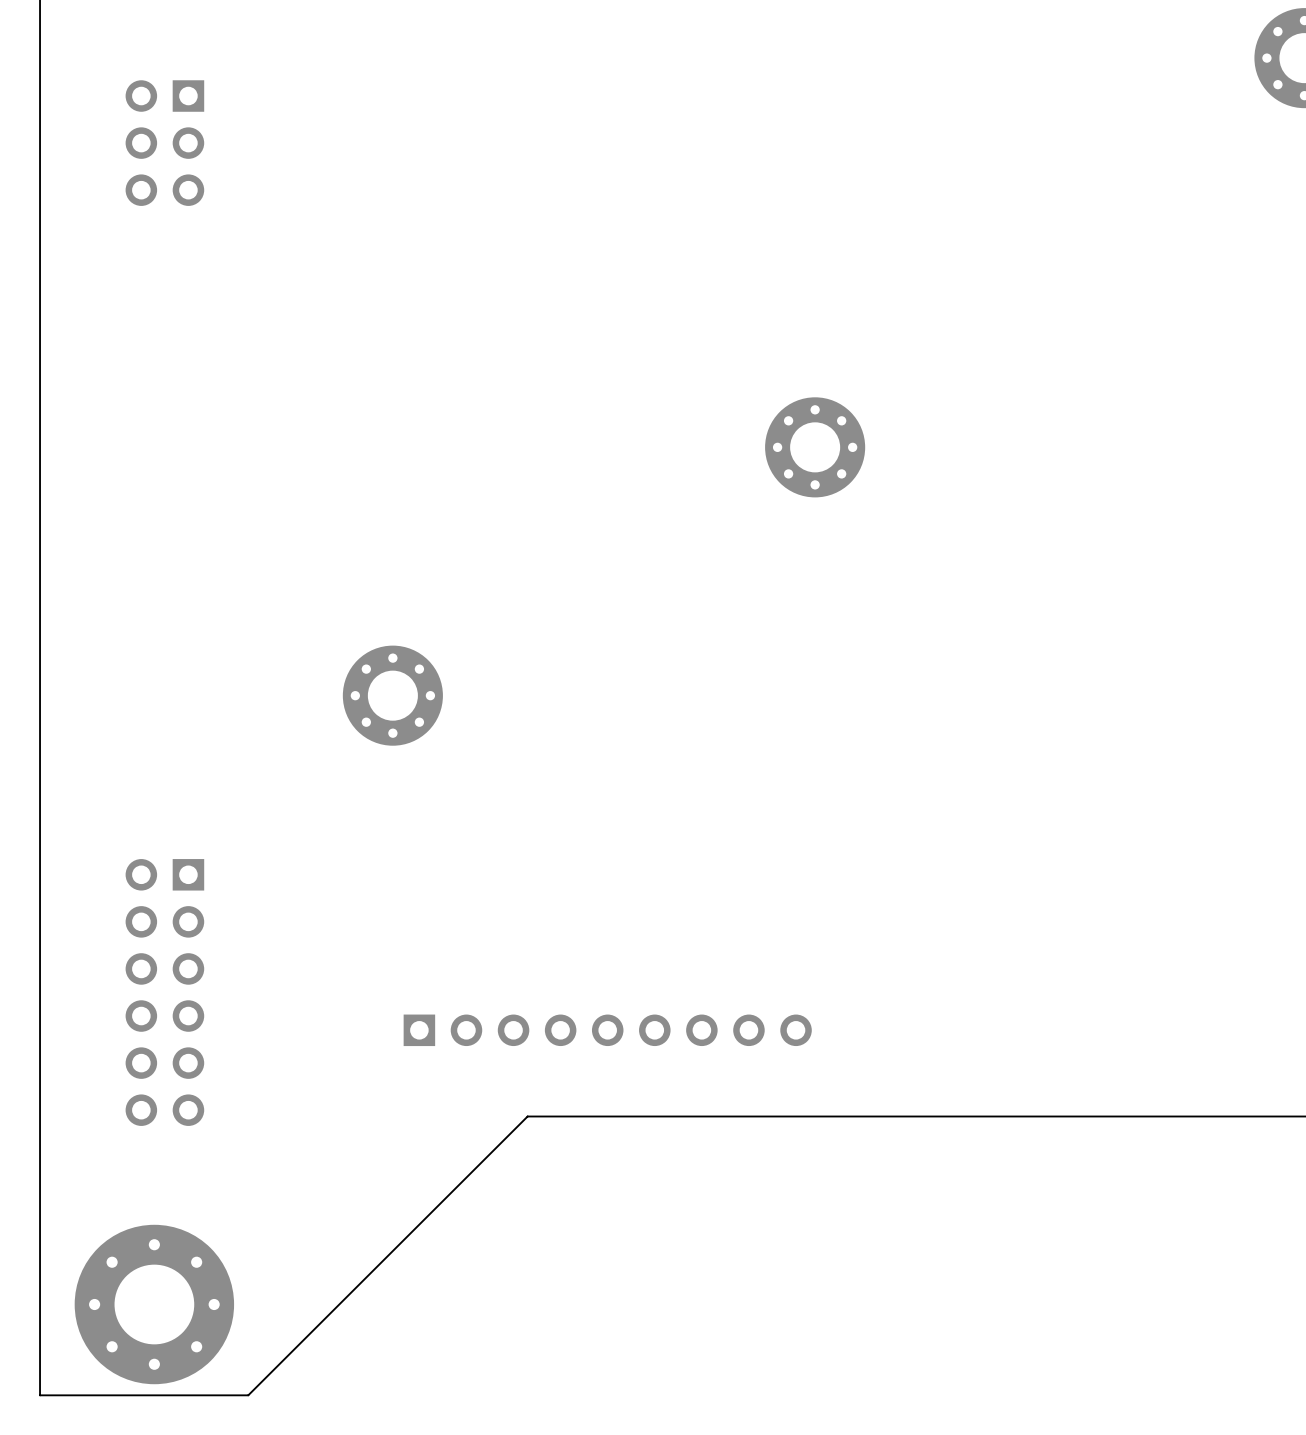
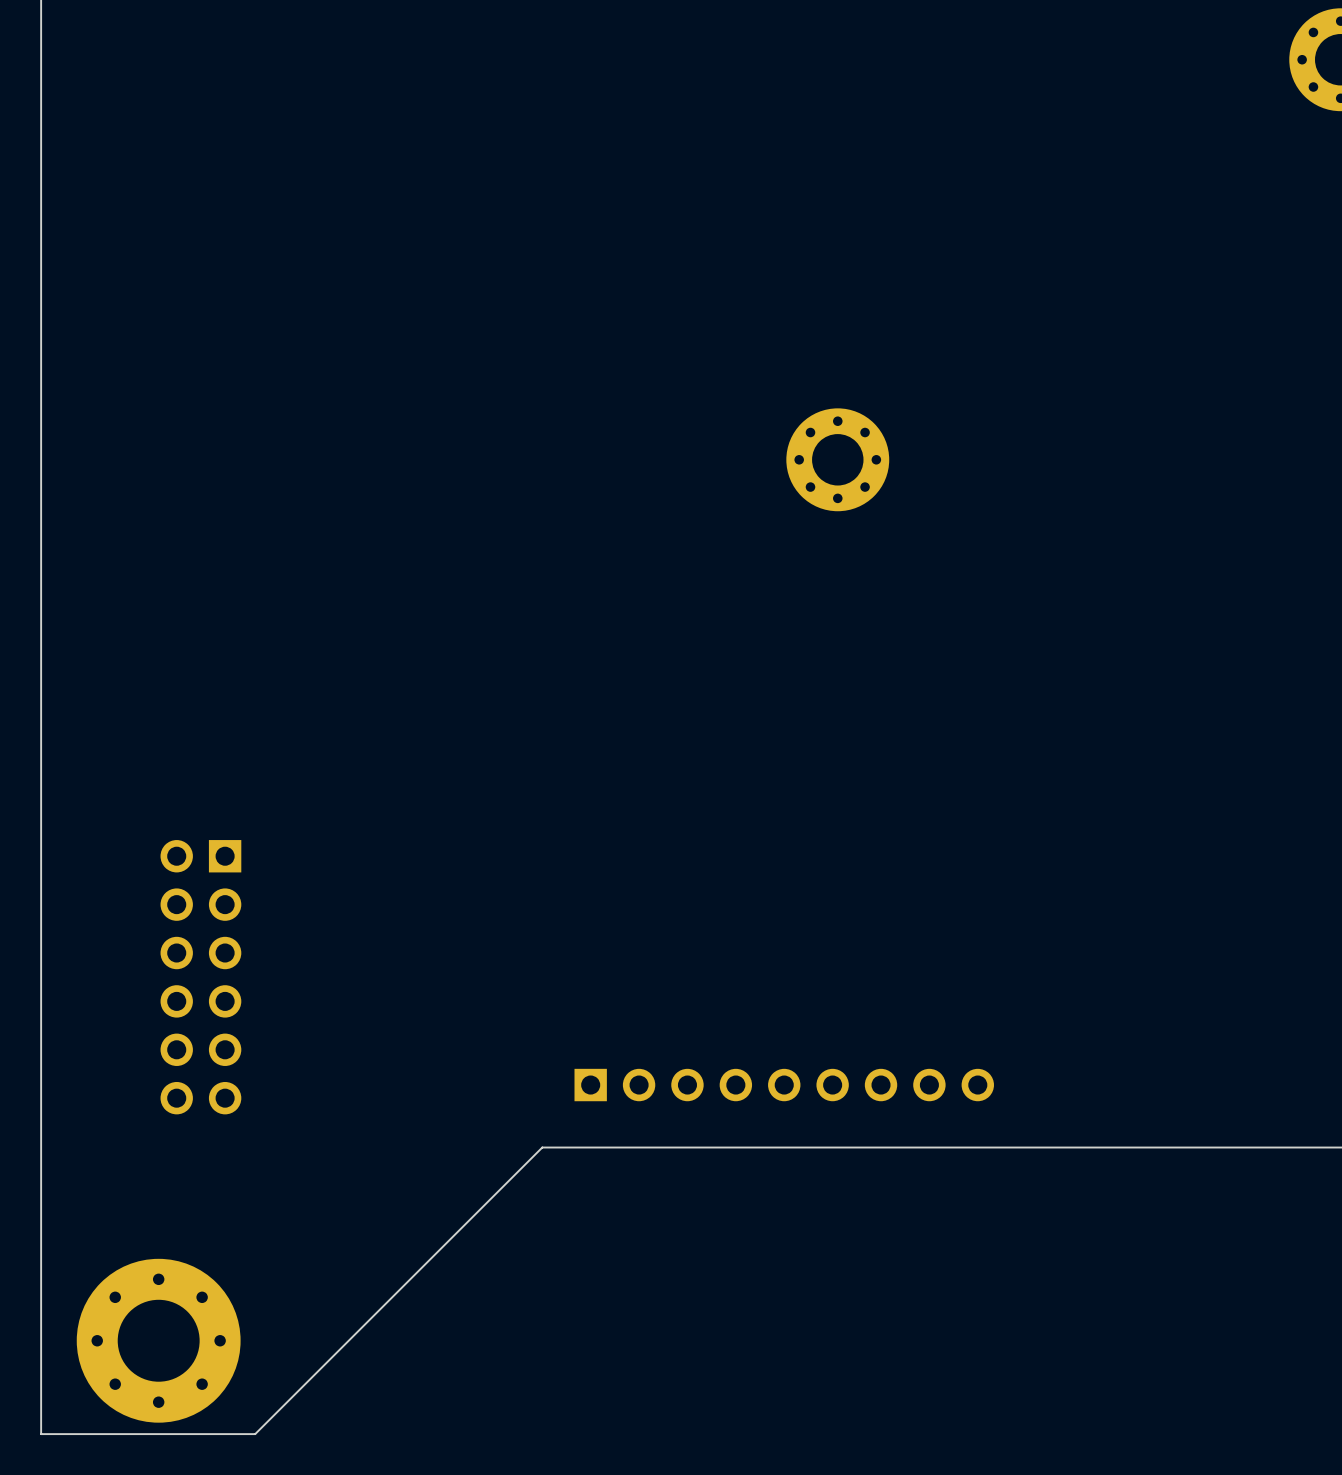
part: (164, 143) -> none
part: (392, 695) -> none
part position: (164, 992) -> (200, 977)
part position: (607, 1030) -> (784, 1085)

